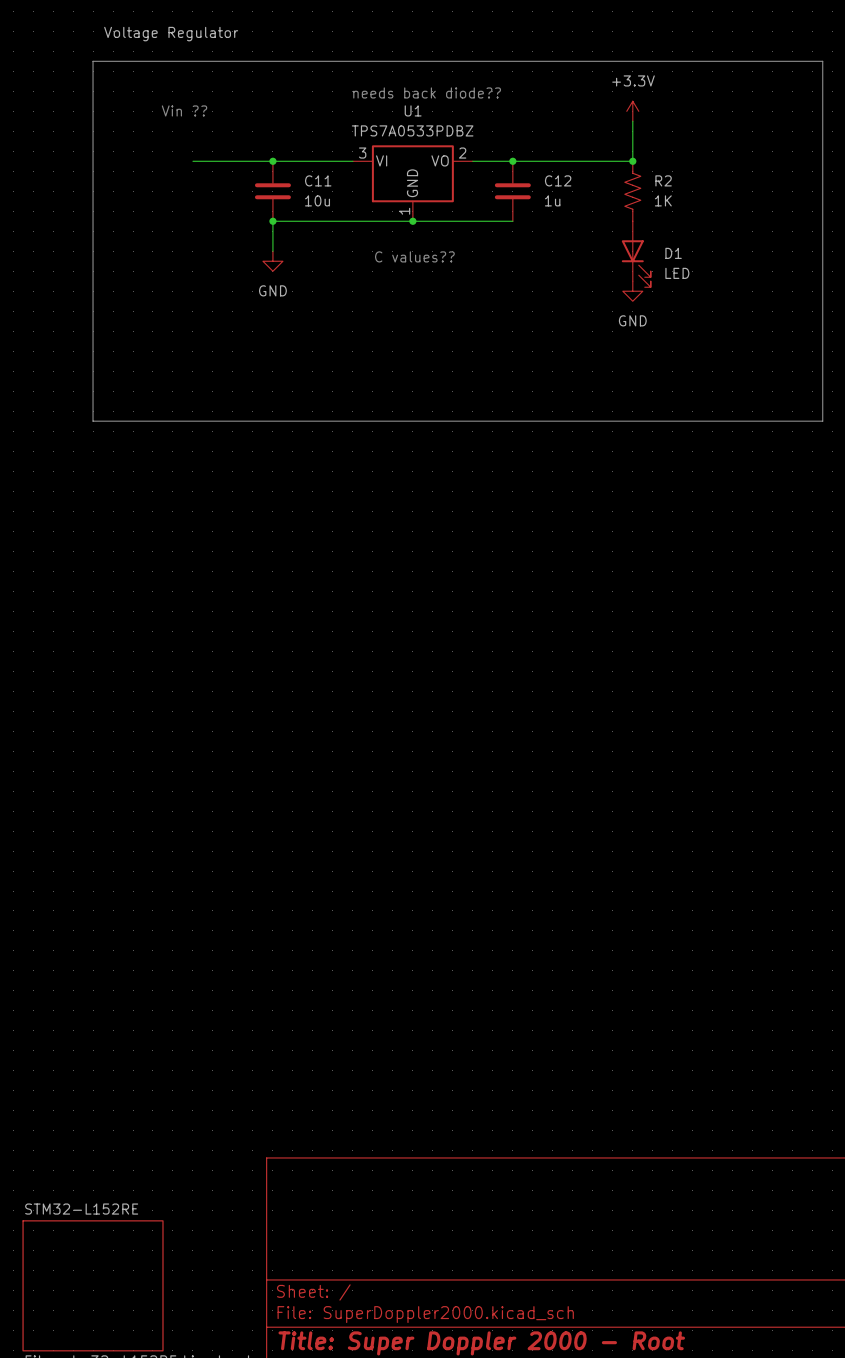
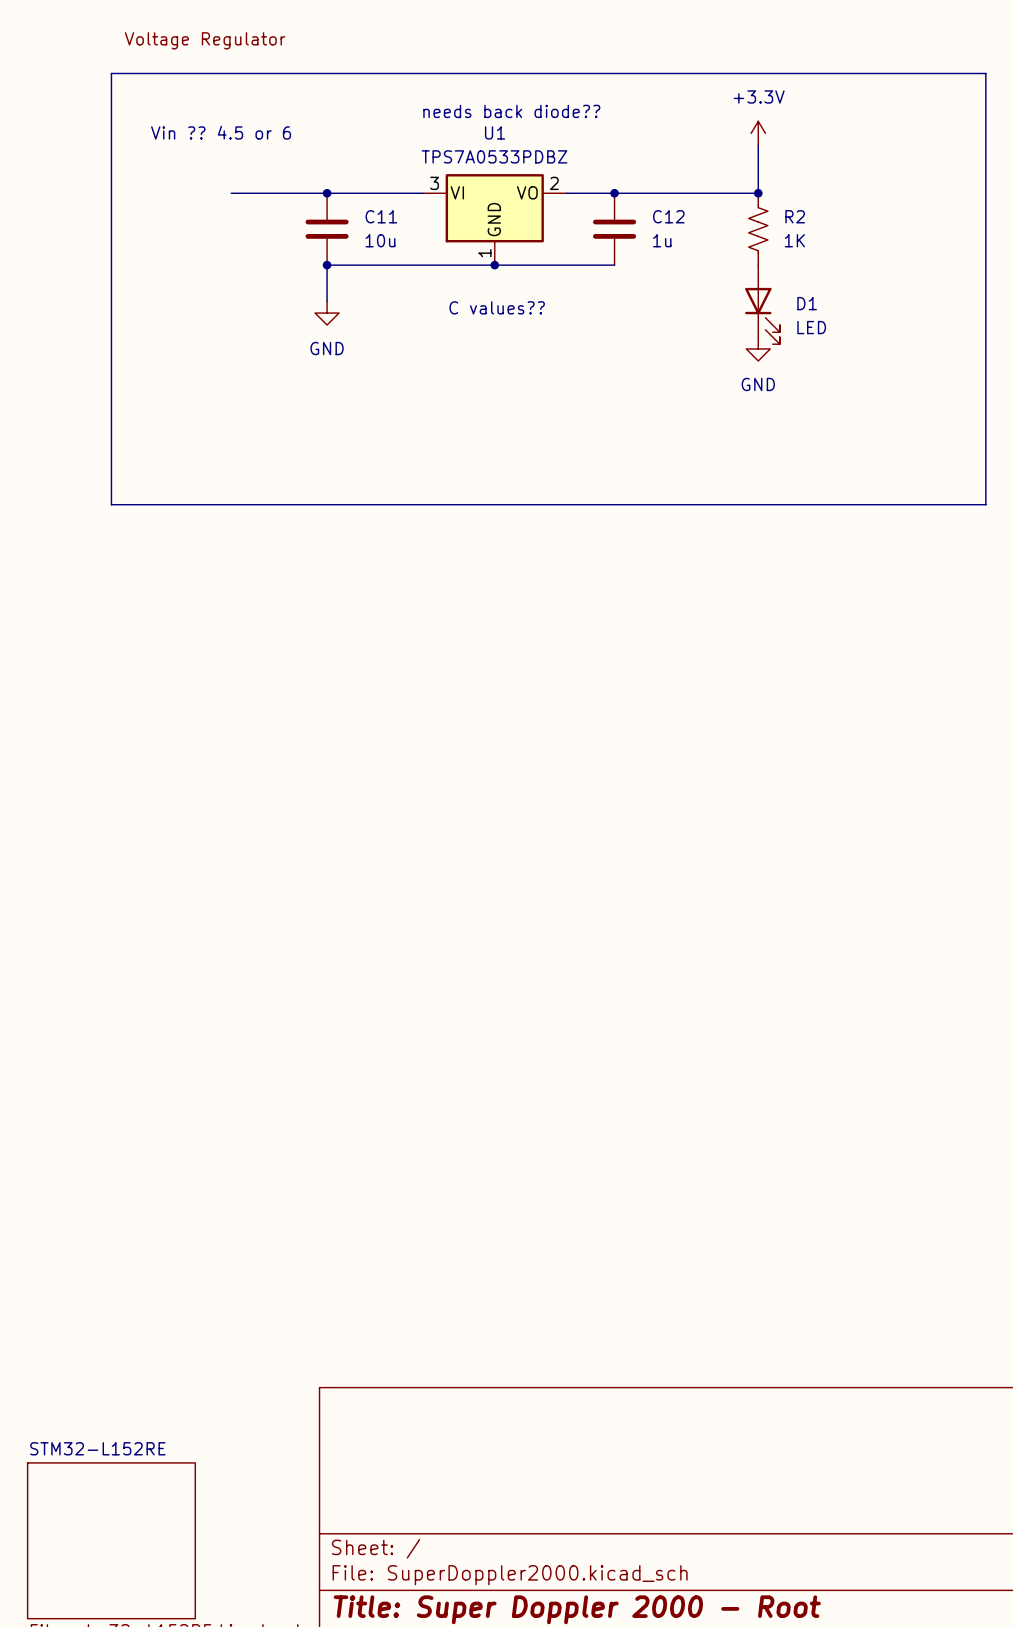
text: Vin ?? (184, 110) -> Vin ?? 4.5 or 6 (221, 132)

